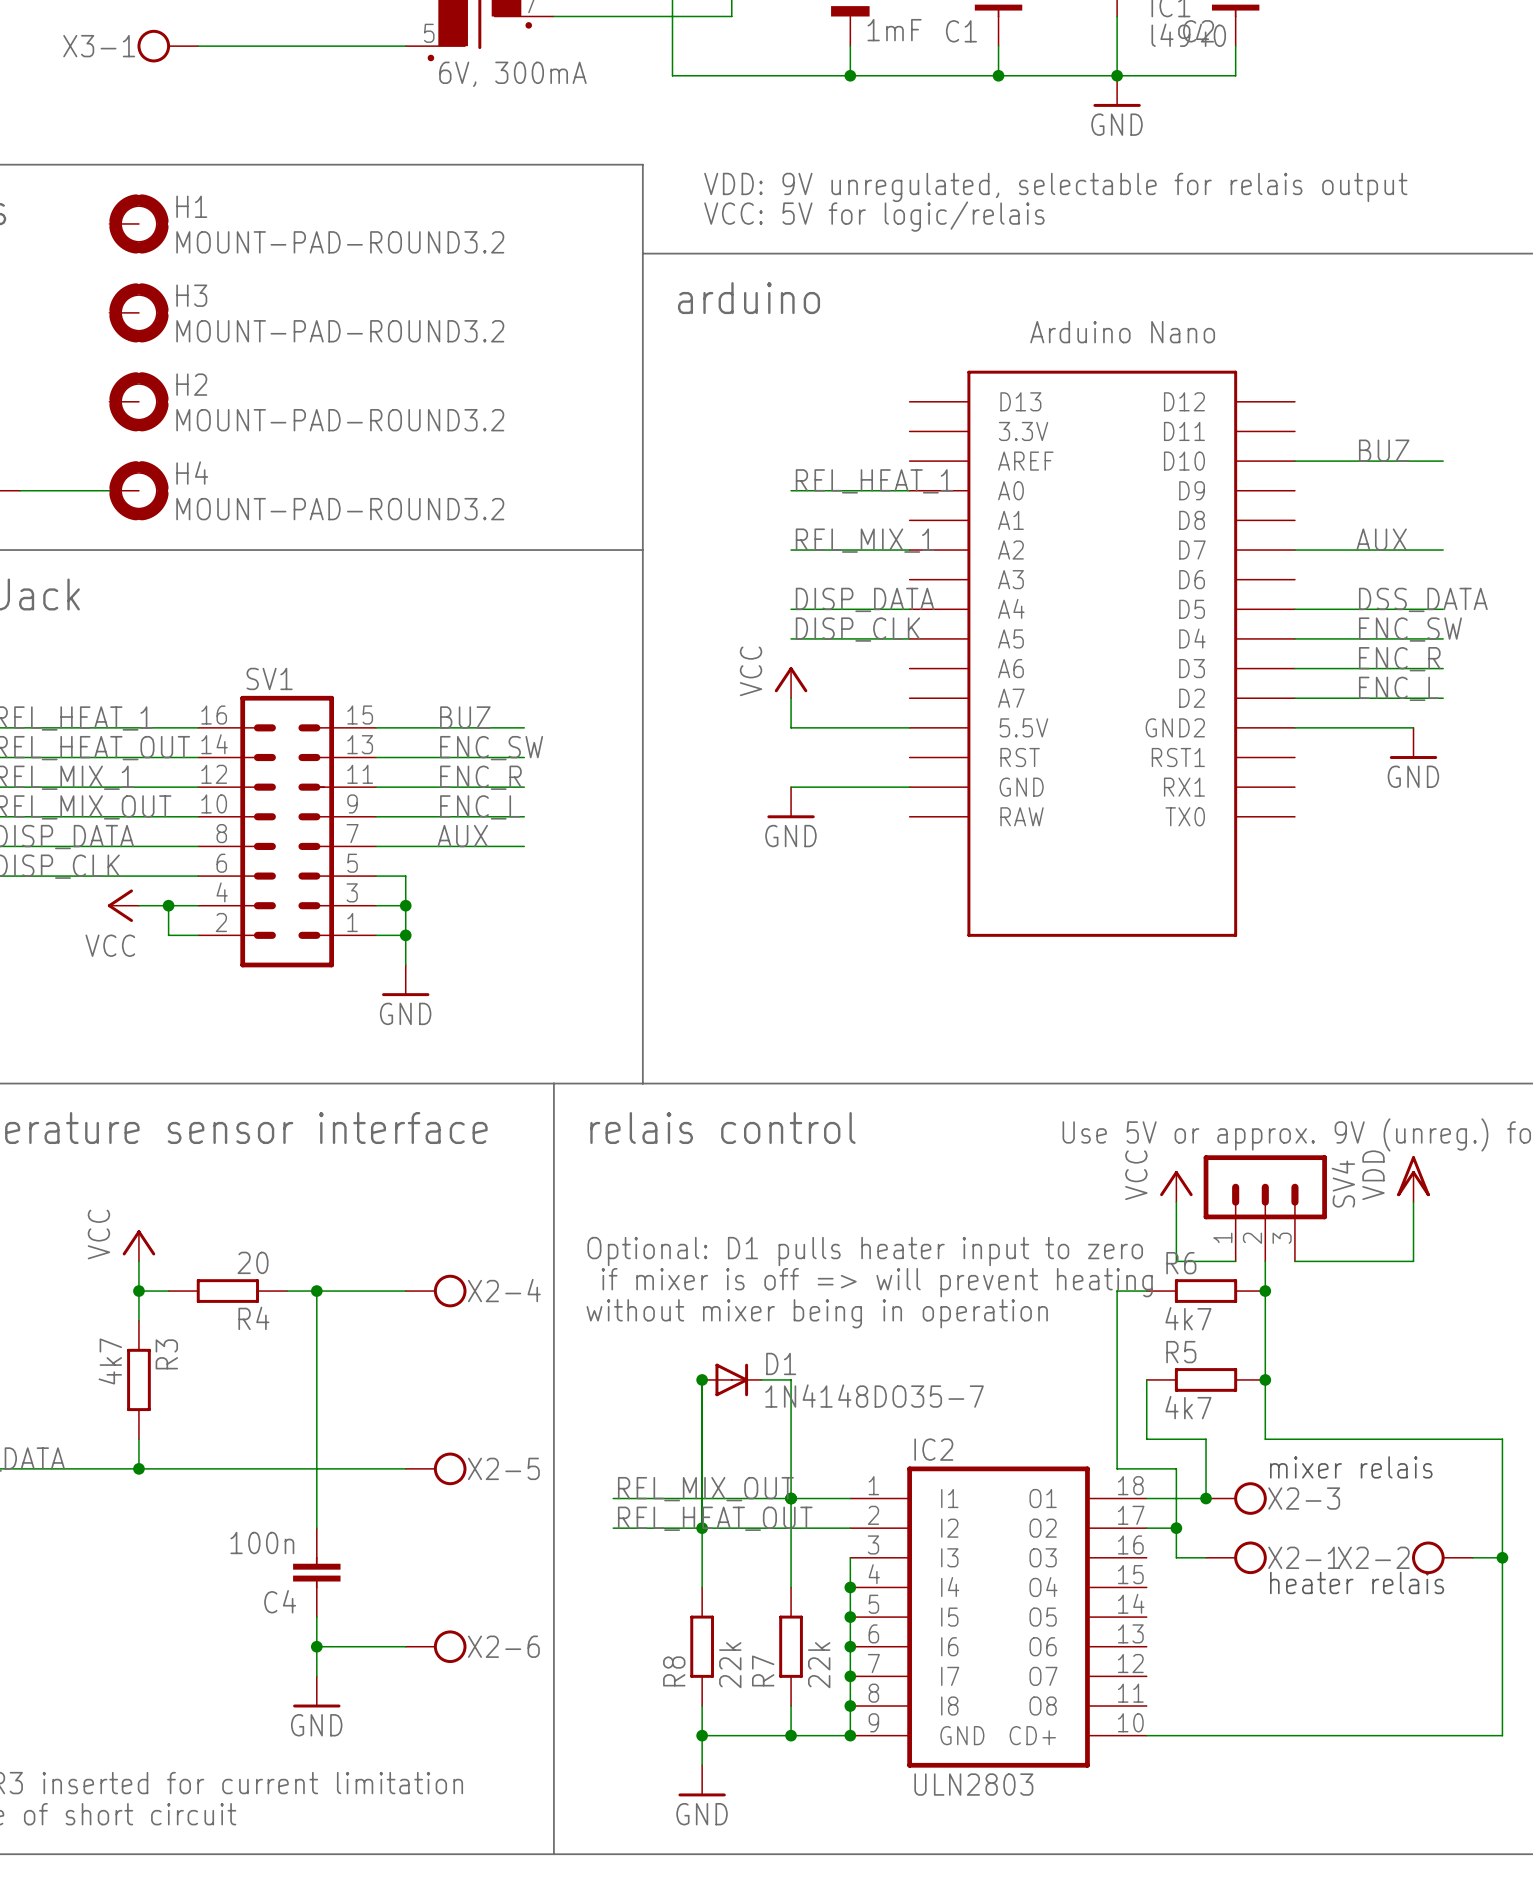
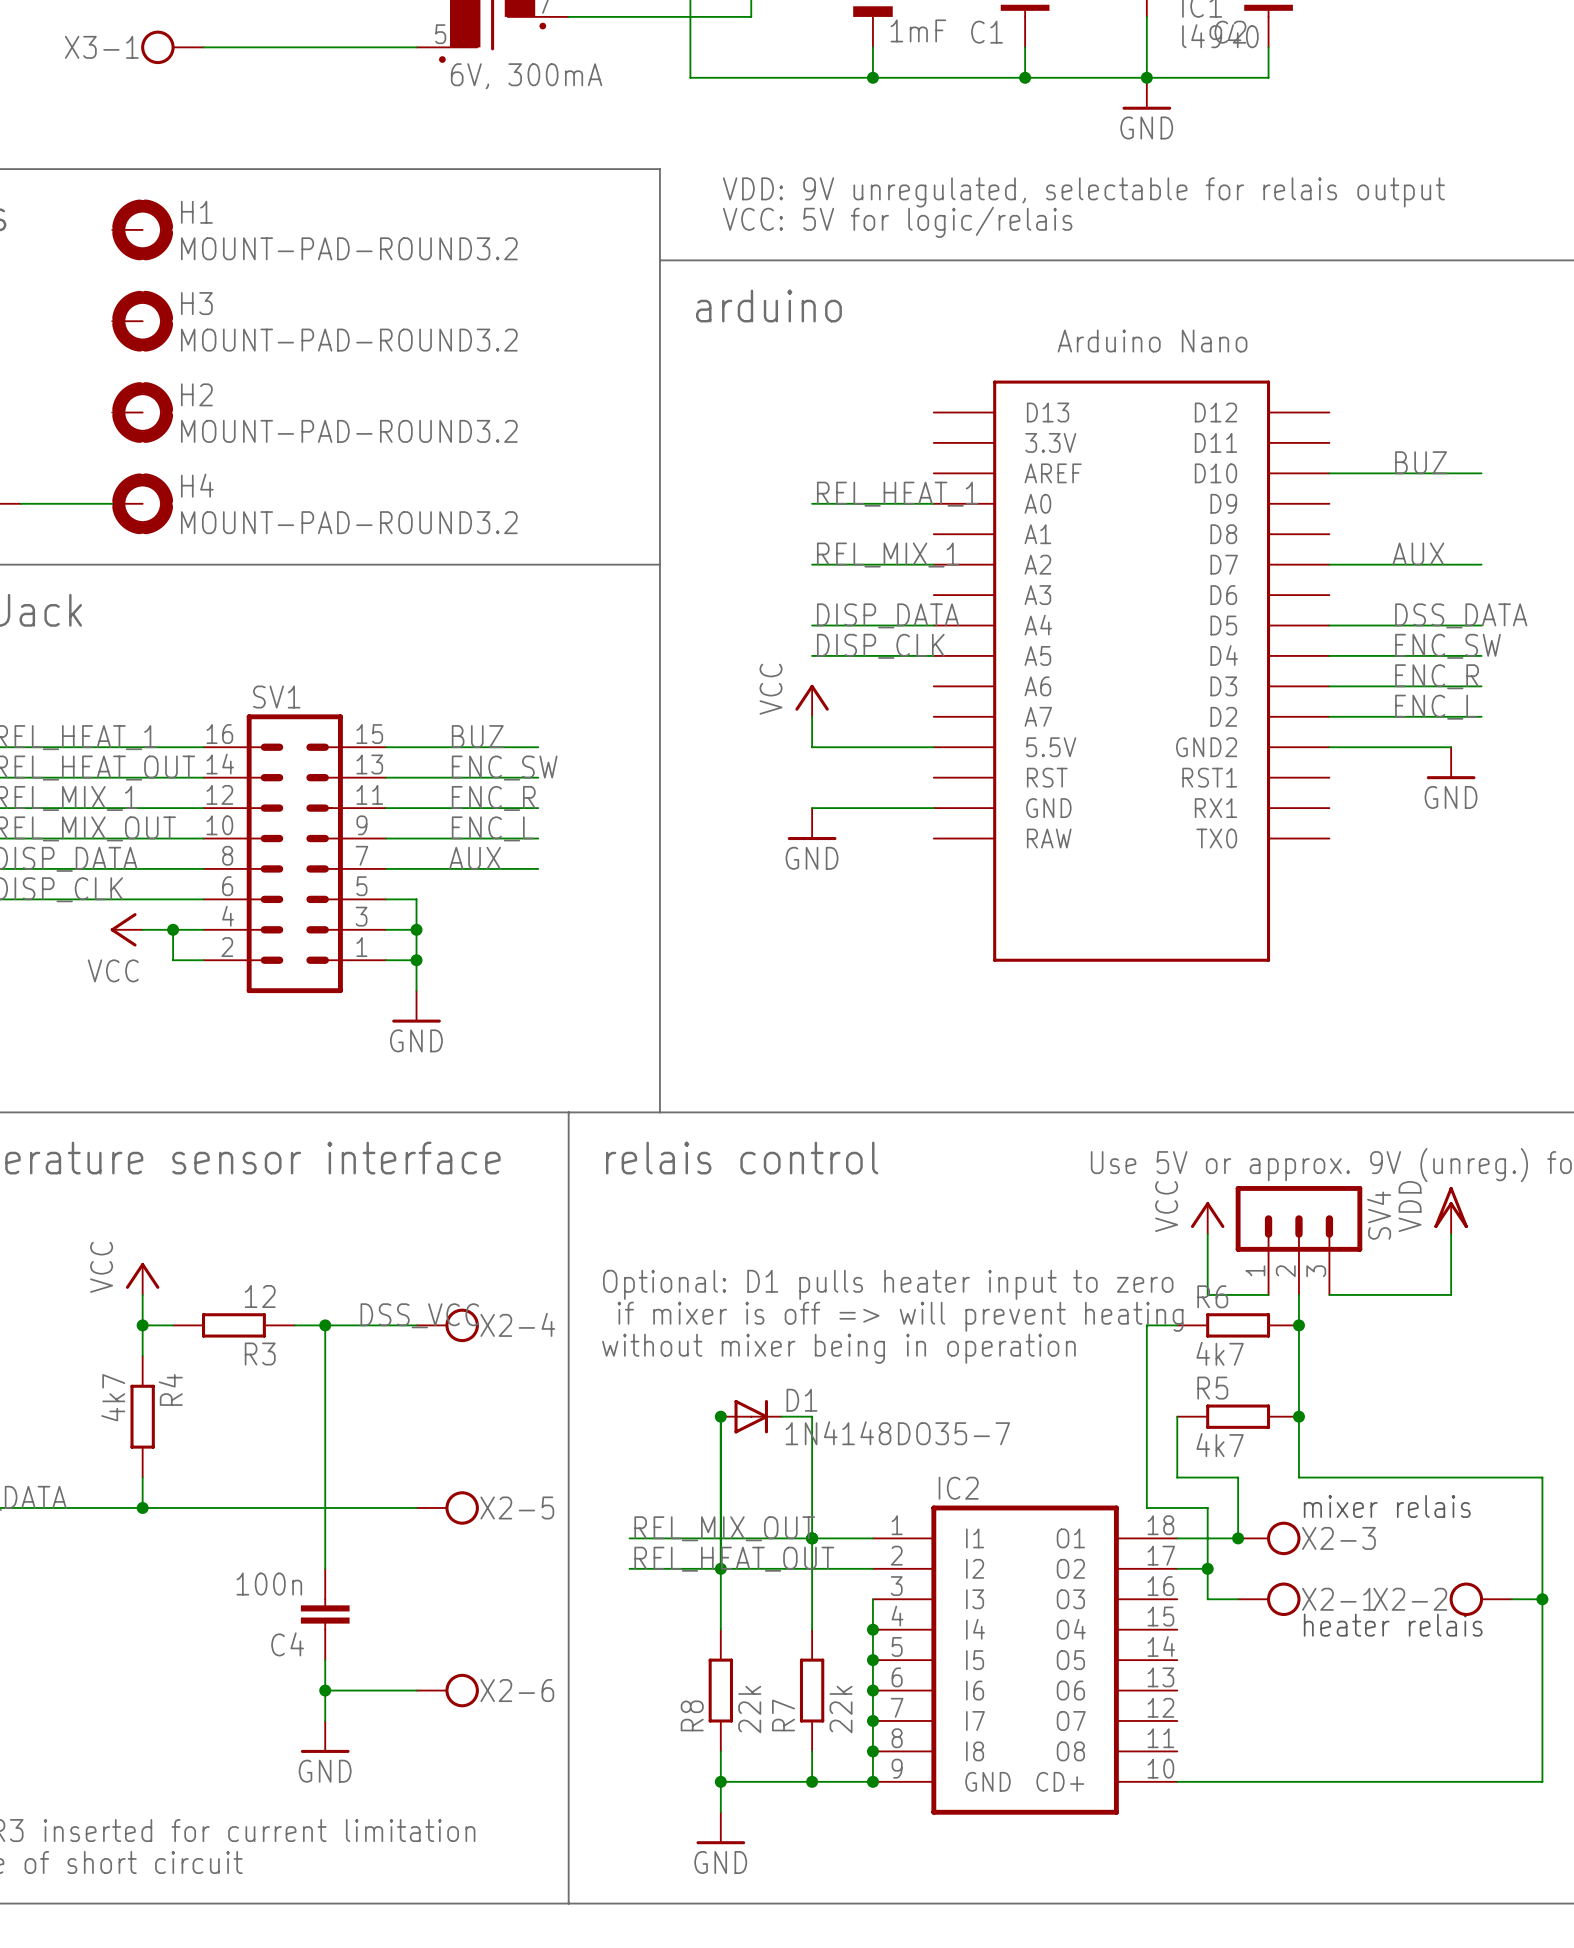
R4 value: 20 (253, 1262) -> 12 (260, 1296)
label: none -> DSS_VCC (419, 1315)
R4 name: R4 (253, 1318) -> R3 (260, 1354)
R3 name: R3 (166, 1354) -> R4 (170, 1389)
IC2 value: ULN2803 (973, 1784) -> none

